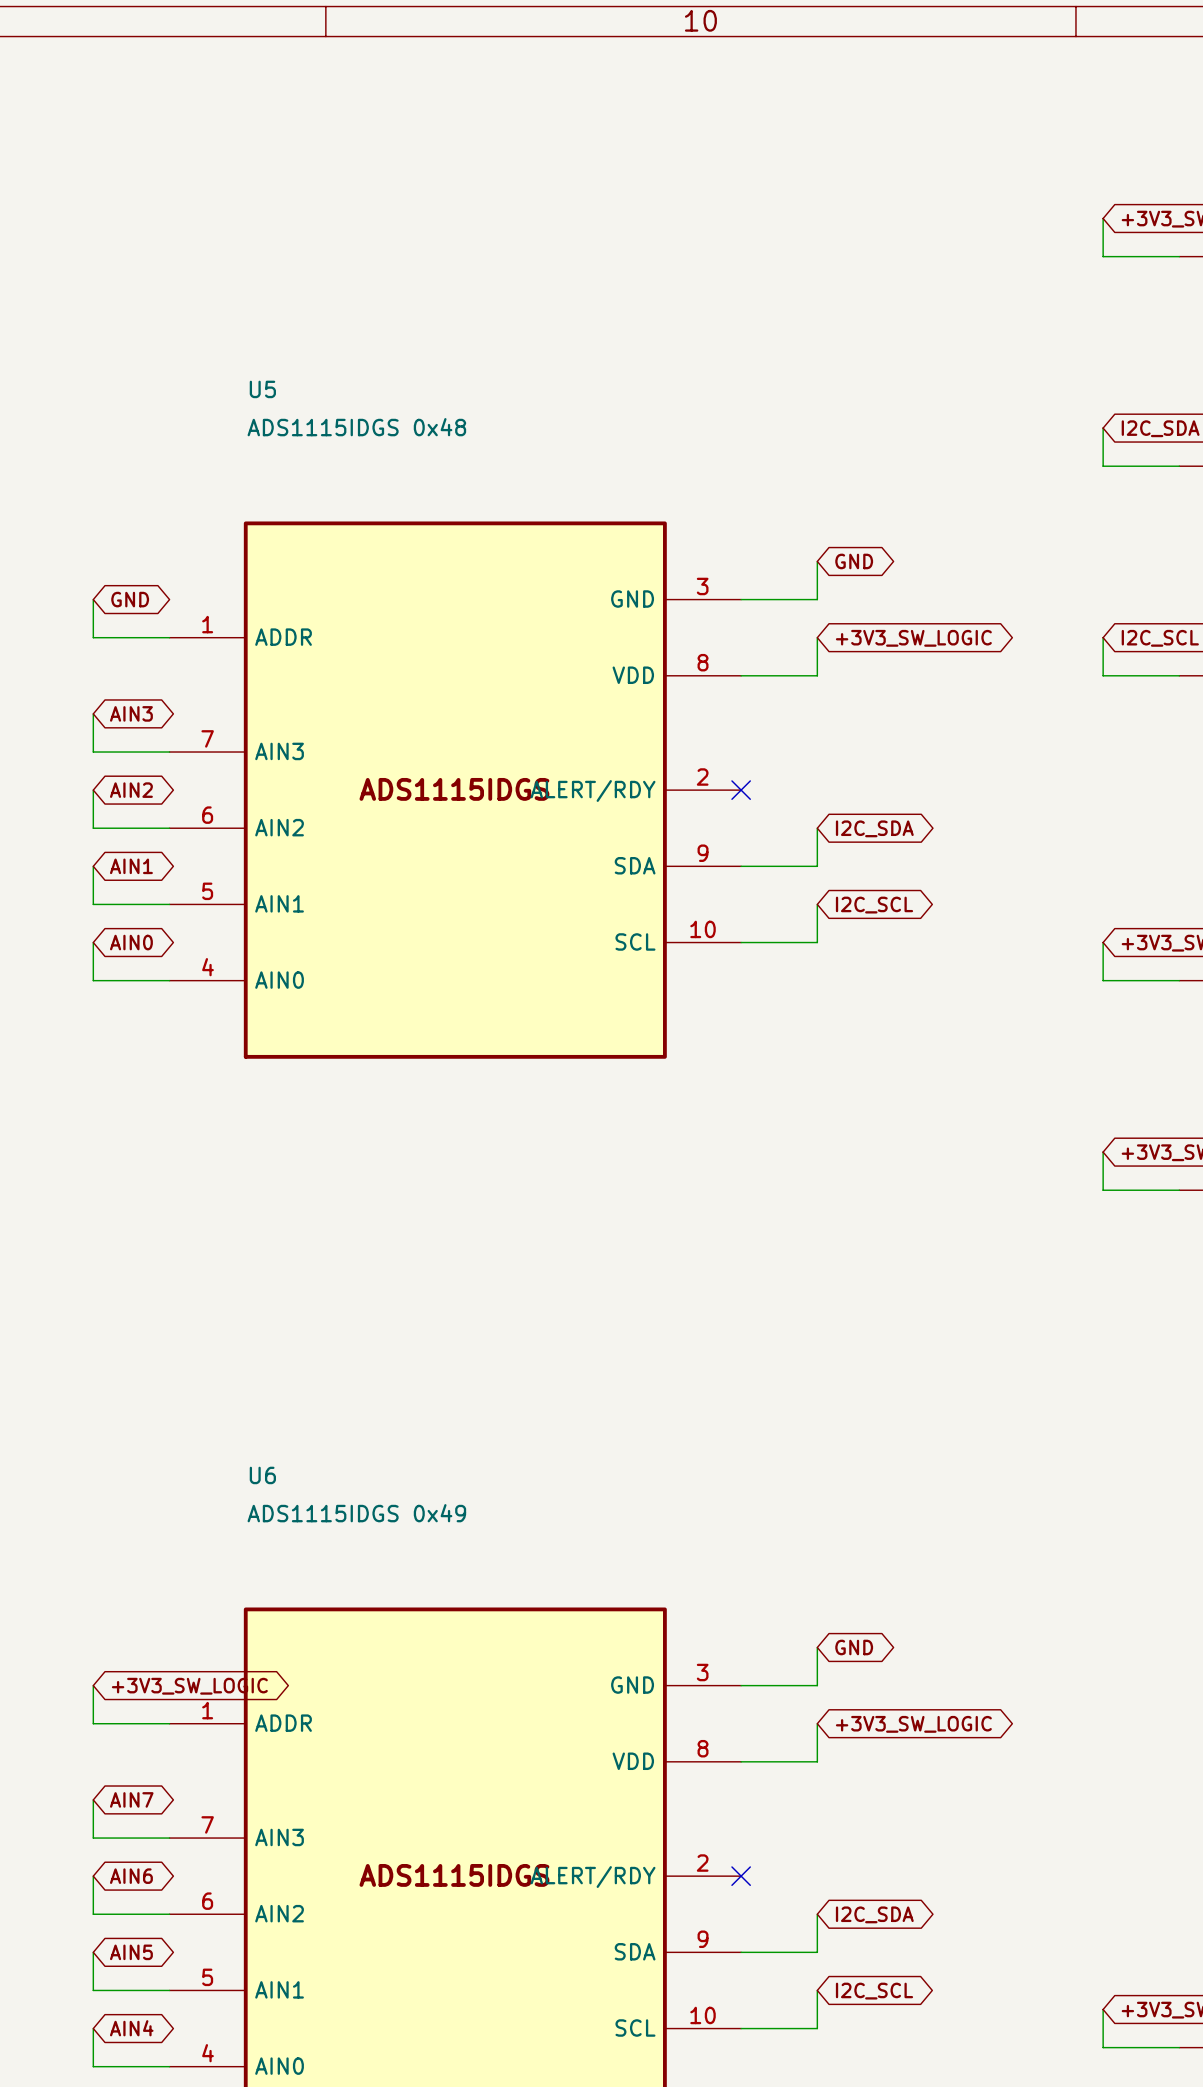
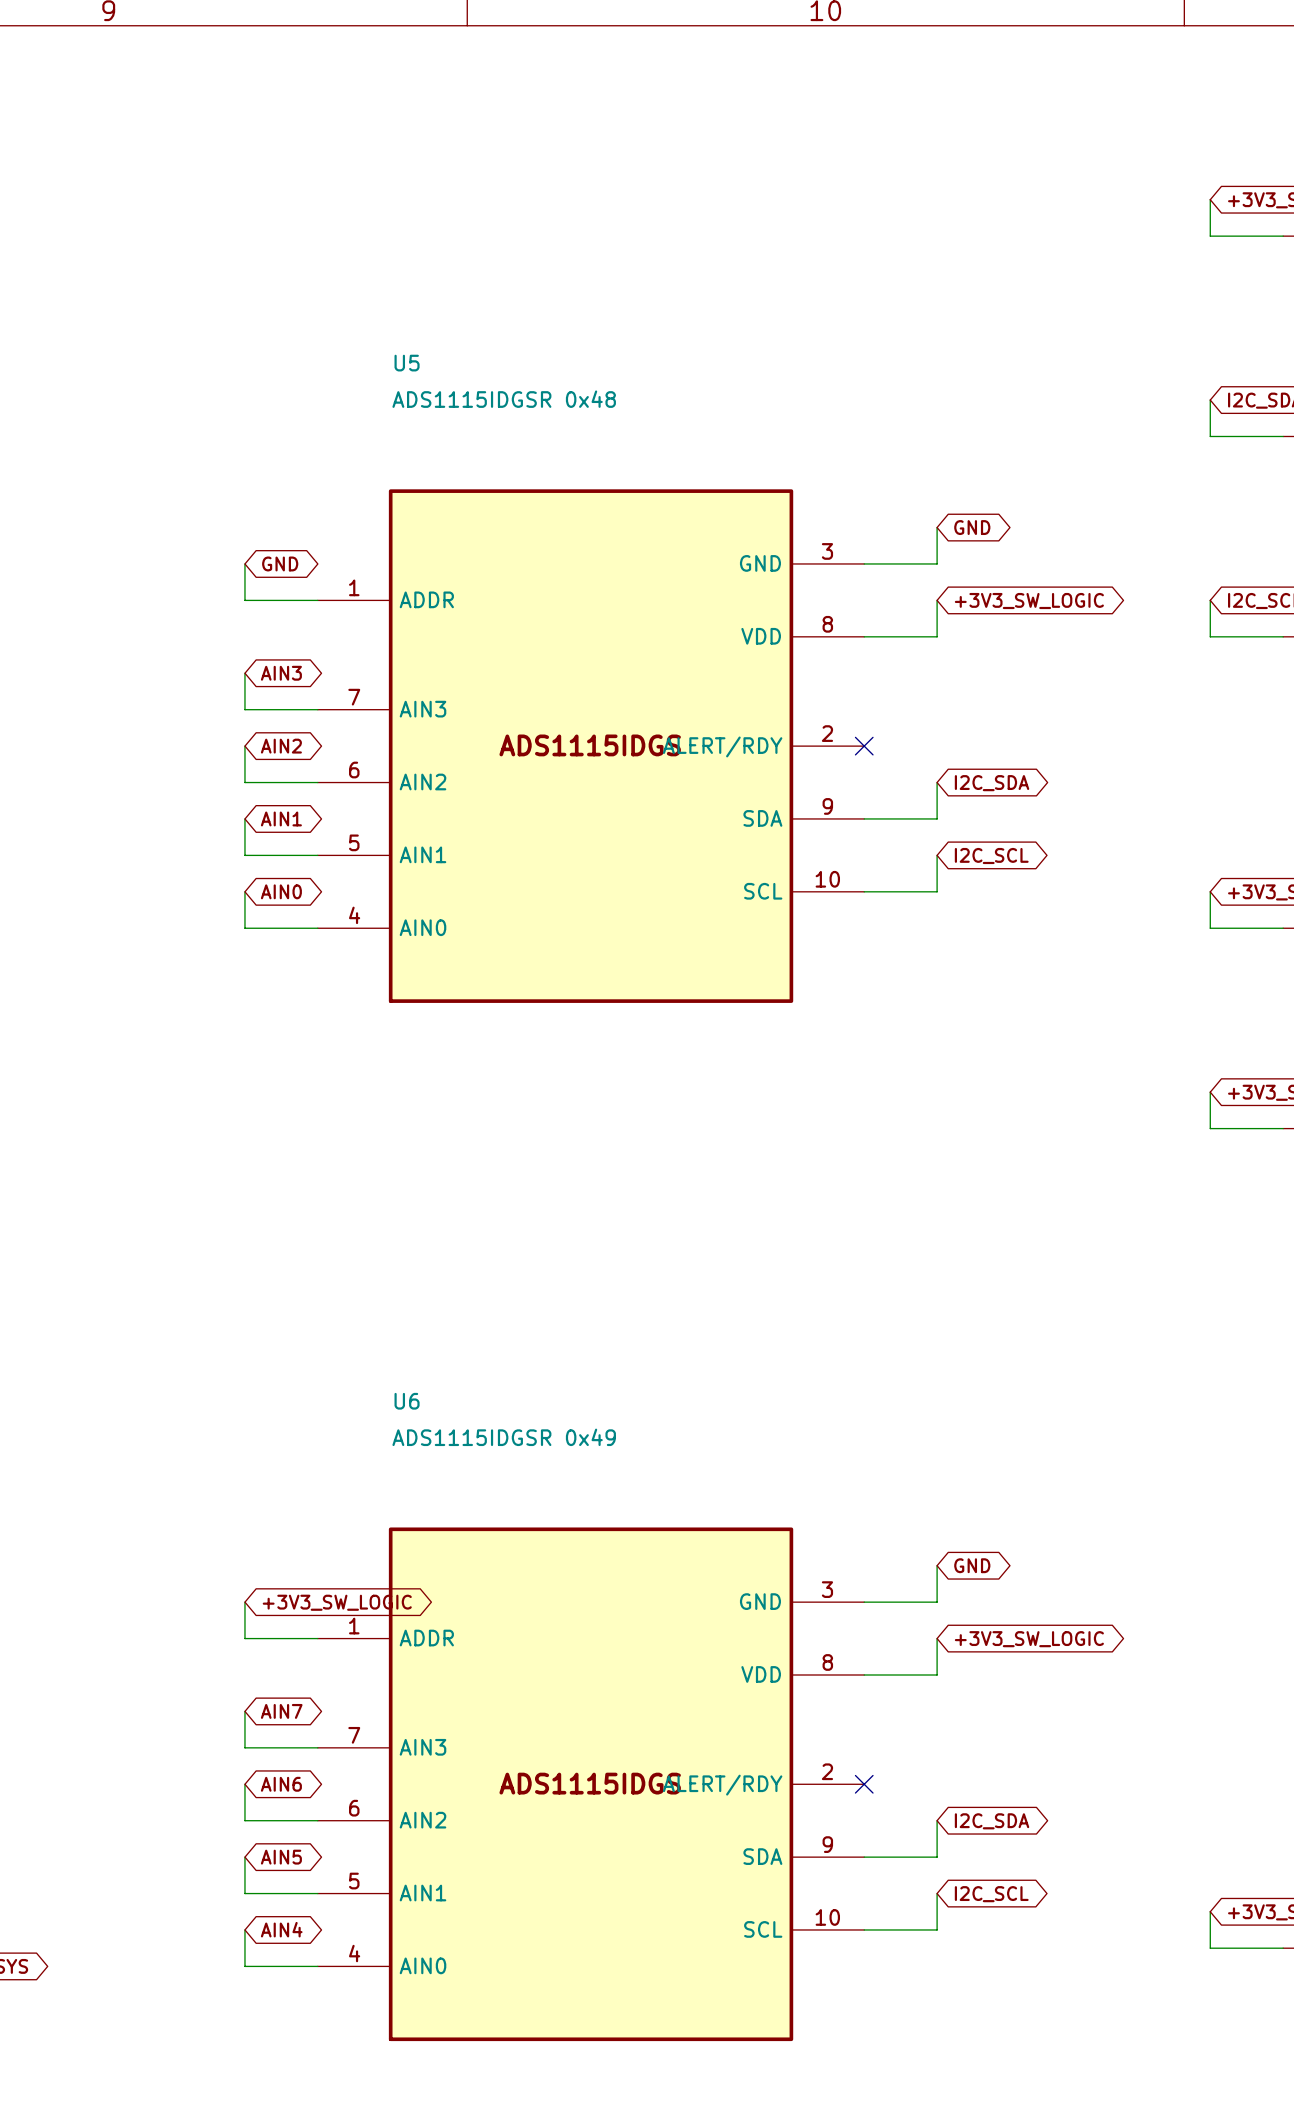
U5 value: ADS1115IDGS 0x48 (356, 427) -> ADS1115IDGSR 0x48 (504, 399)
U6 value: ADS1115IDGS 0x49 (356, 1513) -> ADS1115IDGSR 0x49 (504, 1437)

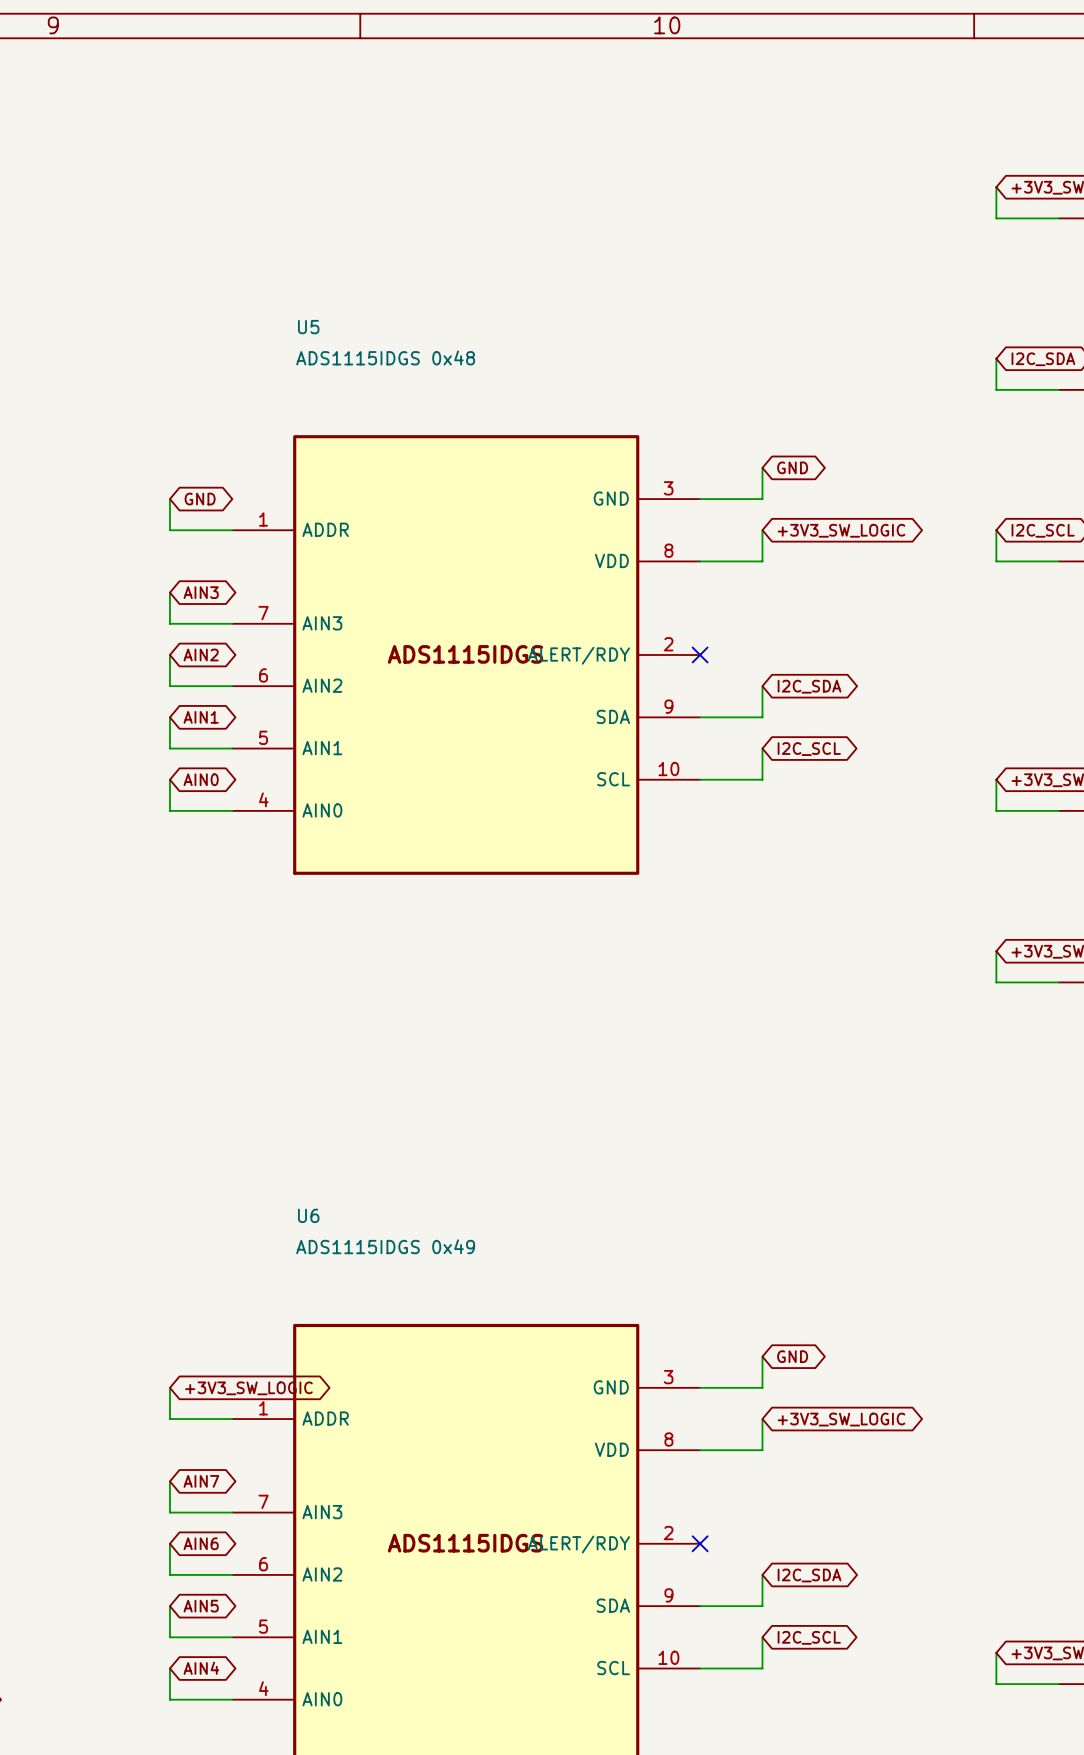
U5 value: ADS1115IDGSR 0x48 (504, 399) -> ADS1115IDGS 0x48 (385, 357)
U6 value: ADS1115IDGSR 0x49 (504, 1437) -> ADS1115IDGS 0x49 (385, 1246)

